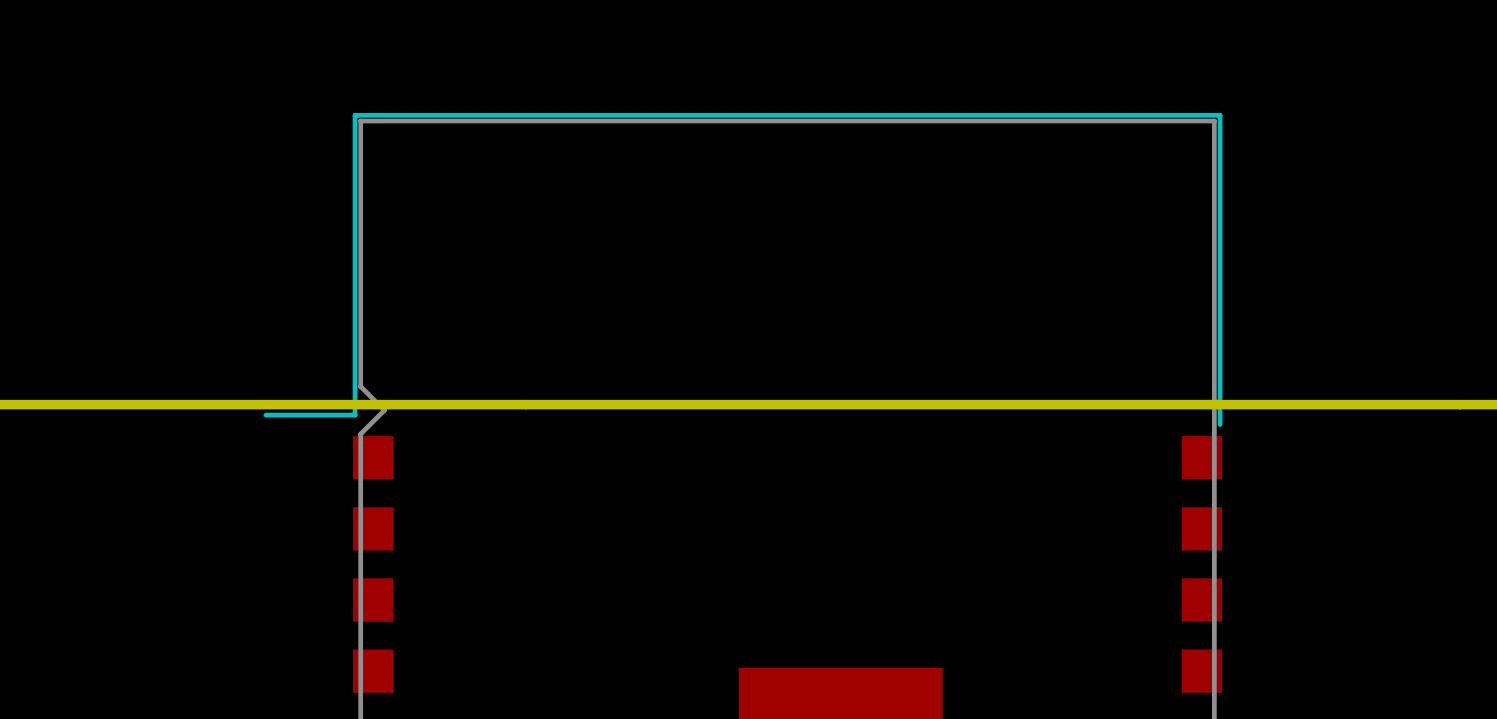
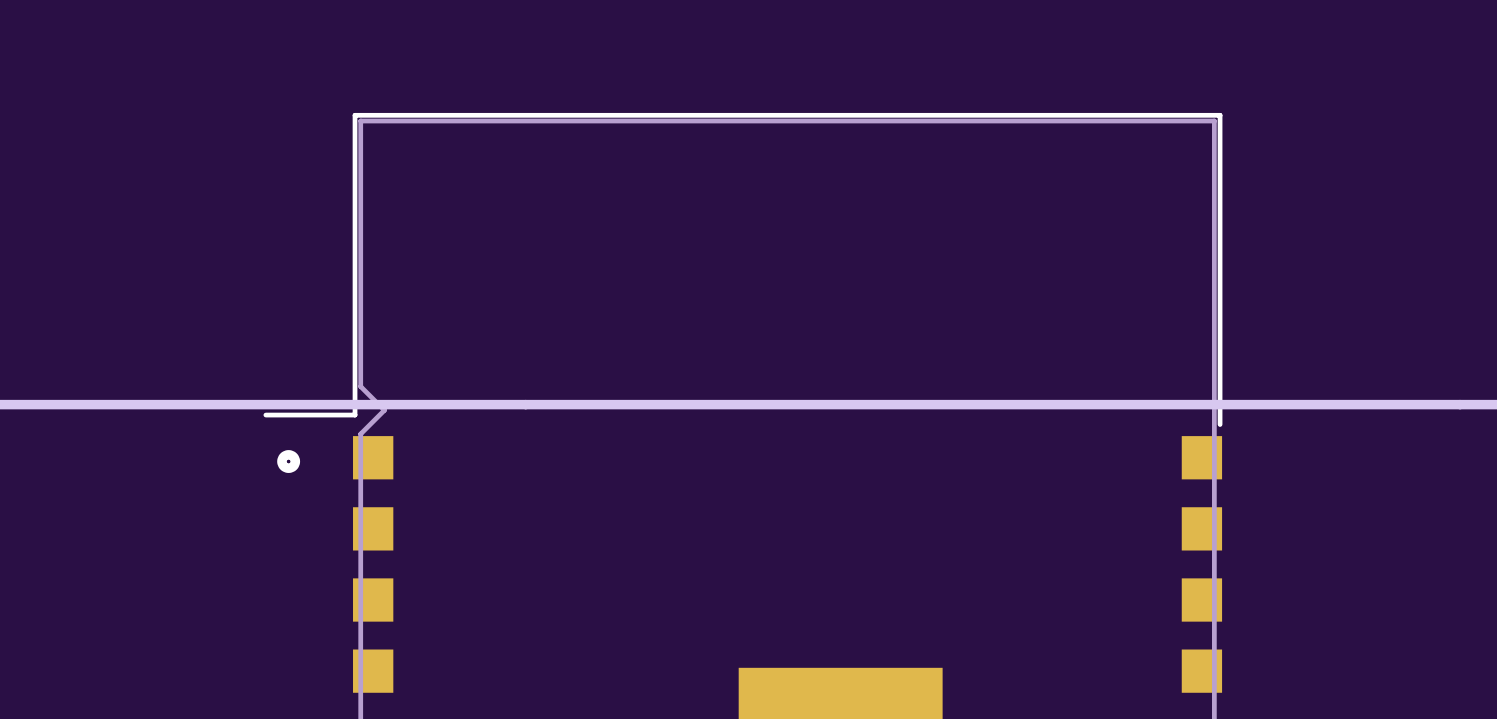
drawing: none -> [277, 450, 301, 473]

